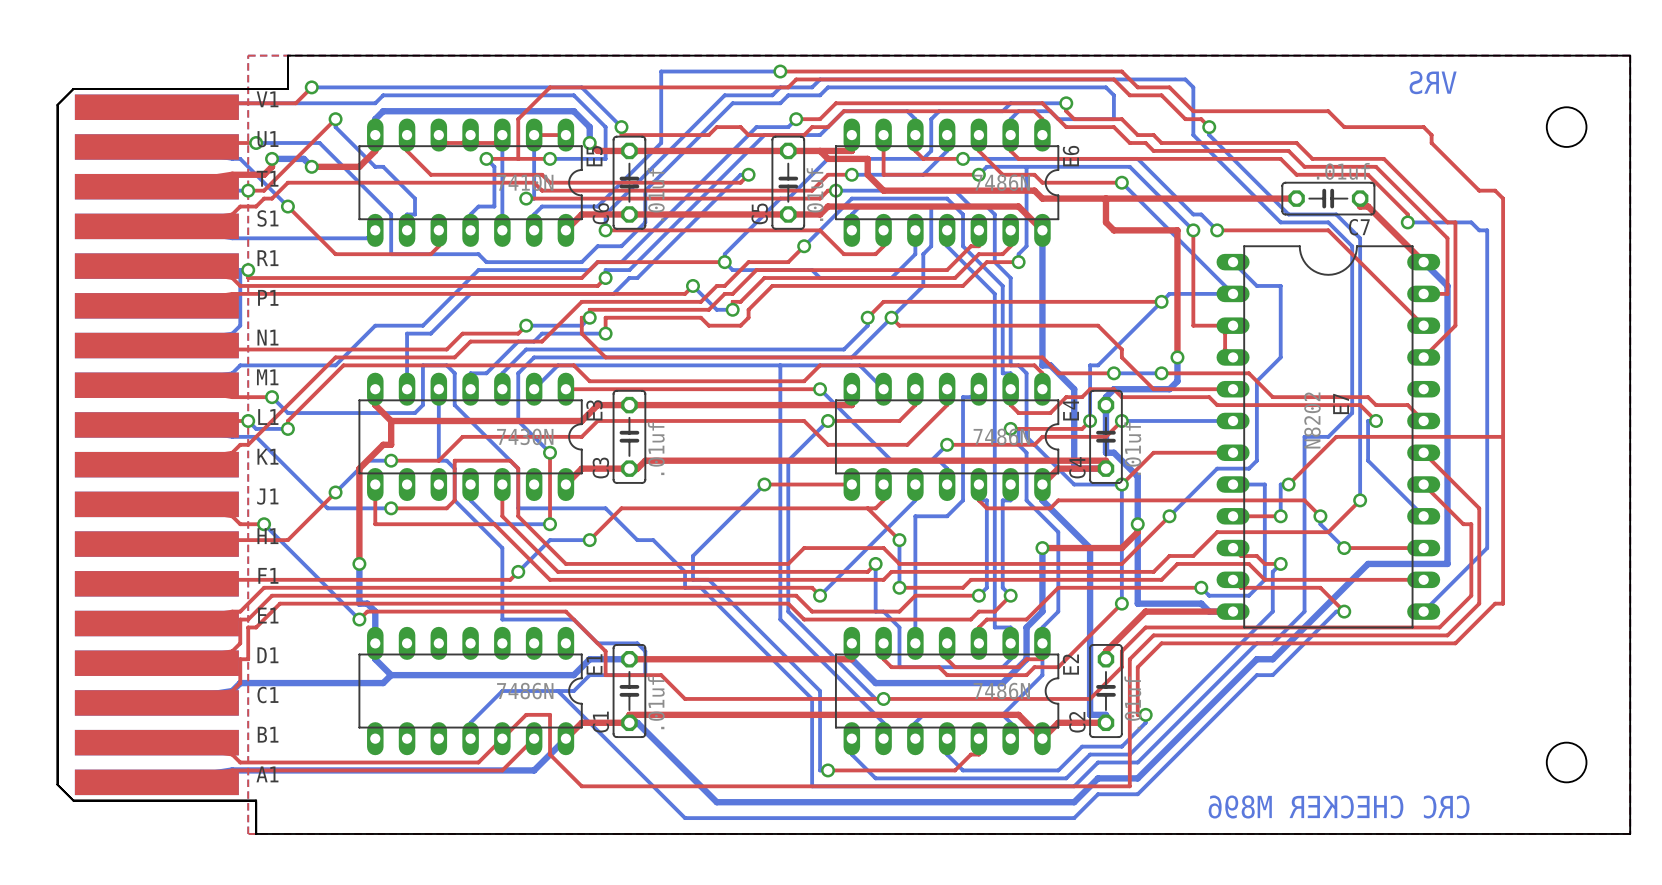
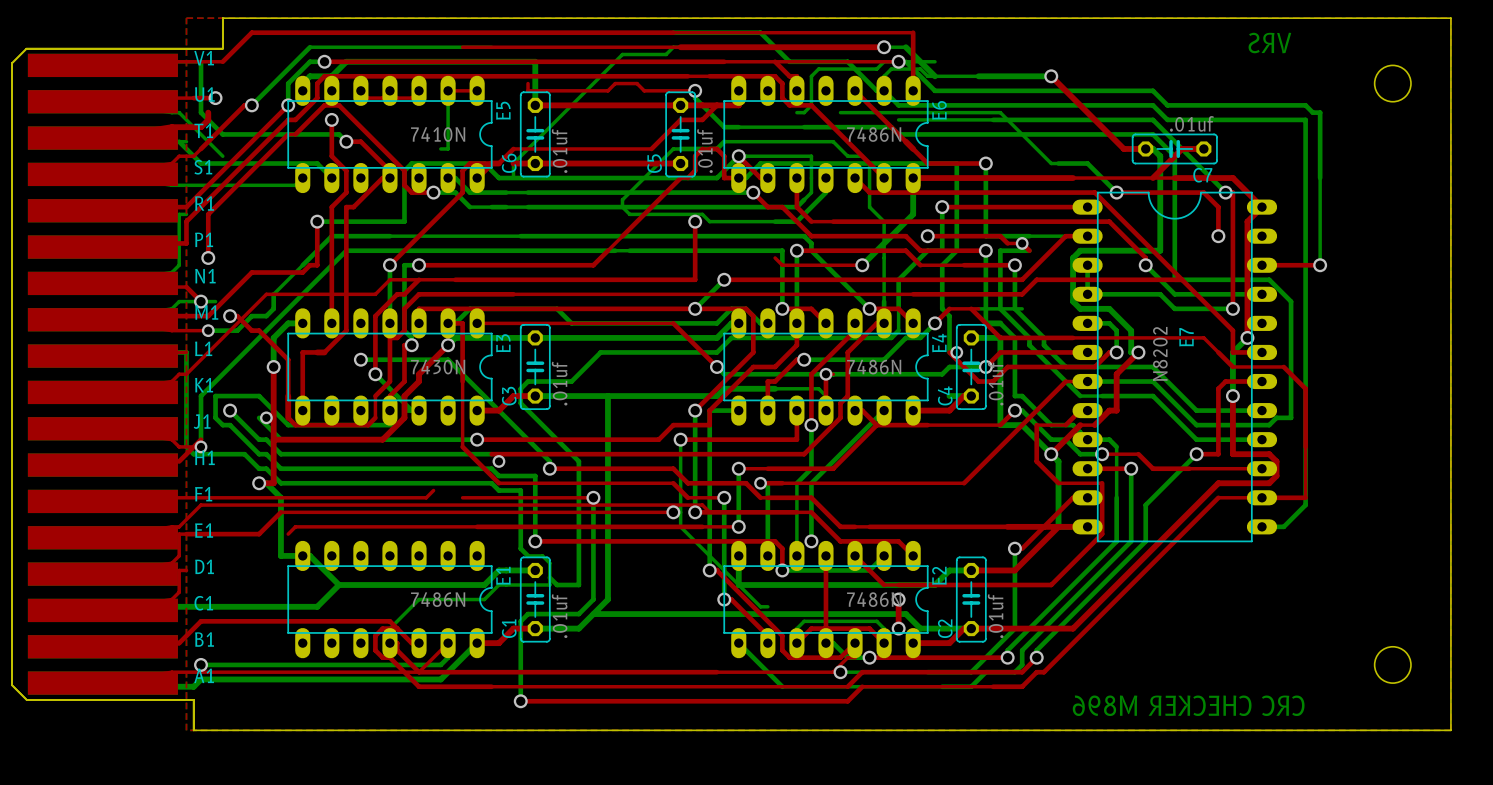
bottom track: (661, 71) (661, 143) (597, 206) (542, 206) (534, 214) (534, 230) -> (506, 192) (469, 192) (455, 178) (448, 178)
via: (780, 71) -> none
top track: (1042, 71) (1121, 71) (1137, 87) (1169, 87) (1193, 111) (1328, 111) (1344, 127) (1423, 127) (1431, 135) (1431, 143) (1479, 190) (1495, 190) (1503, 198) (1503, 603) (1495, 603) (1455, 643) (1161, 643) (1137, 667) (1137, 714) (1145, 714) -> none
top track: (311, 87) (295, 103) (287, 103) -> (673, 32) (251, 32) (222, 61)
bottom track: (311, 87) (383, 87) -> (251, 105) (310, 47)
via: (311, 87) -> none
top track: (550, 87) (518, 119) (518, 158) -> none
bottom track: (581, 87) (621, 127) -> none
top track: (788, 87) (796, 79) (1113, 79) (1129, 95) (1161, 95) (1185, 119) (1201, 119) (1209, 127) -> (680, 47) (884, 47)
bottom track: (812, 87) (820, 79) (1185, 79) (1193, 87) (1193, 135) (1280, 222) (1328, 222) (1352, 246) (1352, 413) (1328, 436) (1304, 436) (1304, 611) (1272, 643) (1256, 643) (1137, 762) (1098, 762) (1074, 786) -> (1131, 468) (1131, 541) (1022, 650) (1022, 664) (1014, 672) (985, 672) (971, 686) (942, 686)
bottom track: (828, 87) (820, 95) (788, 95) (780, 103) (732, 103) (645, 190) (645, 222) (621, 246) -> (753, 192) (528, 192)
via: none -> (884, 47)
bottom track: (1034, 87) (1105, 87) (1113, 95) (1113, 119) -> (905, 47) (934, 76)
bottom track: (264, 103) (375, 103) (383, 95) (573, 95) (605, 127) (605, 158) (550, 158) -> (201, 61) (201, 112) (222, 134) (339, 134) (346, 141)
bottom track: none -> (324, 61) (310, 61) (288, 83) (288, 105)
via: none -> (324, 61)
top track: (835, 103) (820, 119) -> (724, 61) (324, 61)
top track: (1026, 103) (1042, 103) (1066, 127) (1113, 127) (1129, 143) (1145, 143) (1153, 150) (1288, 150) (1304, 166) (1376, 166) (1447, 238) (1447, 293) (1423, 293) -> none
via: none -> (898, 61)
top track: (1066, 103) (1066, 111) (1074, 119) (1121, 119) (1137, 135) (1153, 135) (1161, 143) (1296, 143) (1312, 158) (1383, 158) (1447, 222) (1455, 222) (1455, 325) (1423, 357) -> none
via: (1066, 103) -> none
top track: (335, 119) (264, 190) (248, 190) -> none
bottom track: (335, 119) (335, 127) (375, 166) (383, 166) (415, 198) (415, 214) (407, 214) (407, 230) -> (179, 141) (201, 163) (317, 163) (331, 178)
via: (335, 119) -> none
bottom track: (796, 119) (788, 127) (756, 127) (621, 262) -> (804, 199) (796, 207) (528, 207)
via: (796, 119) -> none
top track: (1042, 119) (1034, 111) (843, 111) (828, 127) (812, 127) (804, 135) -> (913, 76) (913, 32)
bottom track: none -> (978, 76) (1051, 76)
top track: none -> (1051, 76) (1123, 148)
via: none -> (1051, 76)
bottom track: (375, 127) (375, 119) (383, 111) (573, 111) (589, 127) (589, 143) -> (302, 83) (310, 76) (331, 76) (346, 61) (535, 61) (535, 105)
via: (621, 127) -> none
bottom track: (1209, 127) (1209, 135) (1288, 214) (1336, 214) (1360, 238) (1360, 500) -> none
via: (1209, 127) -> none
top track: (375, 135) (375, 150) (359, 166) (311, 166) -> none
top track: (407, 135) (407, 150) (430, 174) (542, 174) (550, 182) (740, 182) (748, 174) -> none
bottom track: (502, 135) (502, 230) -> none
bottom track: none -> (695, 90) (695, 98) (724, 127) (738, 127)
via: none -> (695, 90)
top track: (883, 135) (883, 174) (978, 174) -> none
top track: (915, 135) (915, 150) (923, 158) (963, 158) -> (796, 90) (796, 76) (789, 76) (775, 61)
bottom track: (915, 135) (915, 119) (907, 111) (843, 111) (820, 135) (764, 135) (629, 270) (605, 270) (605, 278) -> none
bottom track: (947, 135) (947, 150) (923, 174) -> (1087, 381) (1153, 381) (1196, 425) (1269, 425) (1276, 417) (1291, 417) (1291, 301) (1269, 279) (1174, 279) (1174, 156) (1153, 134) (898, 134) (891, 127) (804, 127)
top track: (978, 135) (978, 150) (1002, 174) (1034, 174) (1042, 182) (1121, 182) -> (855, 90) (905, 141)
top track: (1010, 135) (1010, 150) (1018, 158) (1280, 158) (1296, 174) (1368, 174) (1407, 214) (1407, 222) -> none
top track: none -> (193, 98) (215, 98)
bottom track: (256, 143) (319, 143) (391, 214) (391, 254) (478, 254) (486, 262) (557, 262) -> (433, 192) (455, 192) (469, 207)
via: (256, 143) -> none
via: none -> (215, 98)
top track: (589, 143) (597, 150) (629, 150) -> none
via: (589, 143) -> none
via: none -> (251, 105)
via: none -> (288, 105)
top track: (820, 150) (828, 158) (867, 158) (867, 174) (883, 190) (1034, 190) -> none
bottom track: (272, 158) (303, 158) (311, 166) -> none
via: (272, 158) -> none
top track: (486, 158) (550, 158) -> none
bottom track: (486, 158) (494, 166) (494, 206) (478, 206) (470, 214) (470, 230) -> none
via: (486, 158) -> none
via: (550, 158) -> none
bottom track: (915, 158) (828, 158) (788, 198) -> (724, 141) (716, 148) (680, 148)
via: (963, 158) -> none
via: (311, 166) -> none
top track: none -> (331, 119) (331, 156) (346, 170) (346, 192) (331, 207) (331, 323)
via: none -> (331, 119)
bottom track: (1129, 166) (1193, 230) -> (993, 119) (1153, 119) (1225, 192)
bottom track: (748, 174) (740, 174) (637, 278) (629, 278) (613, 293) -> (869, 308) (811, 250) (811, 243) (804, 236) (520, 236)
via: (748, 174) -> none
top track: (851, 174) (828, 174) (812, 190) (542, 190) (534, 182) (367, 182) -> (433, 192) (411, 192) (404, 185) (404, 170) (339, 105) (324, 105) (295, 134)
via: (851, 174) -> none
bottom track: (978, 174) (986, 166) (1026, 166) (1026, 246) (1018, 254) (1018, 262) -> none
via: (978, 174) -> none
top track: (359, 182) (287, 182) (272, 198) (264, 198) -> (251, 105) (244, 105) (201, 148)
top track: none -> (288, 134) (208, 214) (208, 257)
bottom track: (1121, 182) (1233, 293) -> none
via: (1121, 182) -> none
via: (248, 190) -> none
via: none -> (346, 141)
top track: (835, 190) (828, 190) (820, 198) -> (738, 178) (724, 178) (724, 156) (716, 148) (709, 148)
via: (835, 190) -> none
top track: (526, 198) (605, 198) -> none
via: (526, 198) -> none
top track: (756, 198) (812, 198) -> (651, 148) (680, 119) (702, 119) (716, 105)
top track: none -> (702, 148) (695, 156) (695, 170) (687, 178)
top track: (1042, 198) (1272, 198) -> (913, 148) (927, 163) (985, 163)
top track: (1105, 198) (1105, 222) (1113, 230) -> (913, 178) (978, 178)
bottom track: none -> (1145, 148) (1153, 148) (1160, 156) (1160, 250) (1080, 250) (1073, 257) (1073, 301) (1080, 308) (1109, 308) (1131, 330) (1131, 352) (1138, 352)
top track: (1360, 198) (1360, 206) (1368, 206) (1391, 230) -> (1174, 178) (1232, 178)
top track: none -> (1203, 148) (1182, 148) (1153, 178)
top track: (287, 206) (335, 254) (430, 254) (438, 246) (438, 230) -> none
via: (287, 206) -> none
bottom track: none -> (738, 156) (716, 178) (498, 178) (484, 163) (411, 163) (404, 170) (404, 221) (317, 221)
via: none -> (738, 156)
top track: none -> (491, 163) (469, 163) (462, 170) (462, 192) (389, 265)
top track: (589, 214) (605, 214) -> (498, 163) (513, 148)
top track: (788, 214) (820, 214) (828, 206) (1018, 206) (1042, 230) -> none
via: none -> (985, 163)
bottom track: (1201, 214) (1217, 230) -> (1058, 163) (1087, 163) (1116, 192)
bottom track: (1407, 222) (1471, 222) (1479, 230) (1487, 230) -> (905, 61) (934, 90) (1153, 90) (1167, 105) (1305, 105) (1312, 112) (1320, 112) (1320, 178)
via: (1407, 222) -> none
top track: (605, 230) (788, 230) -> (622, 236) (680, 178)
via: (605, 230) -> none
top track: (796, 230) (820, 230) (843, 254) (875, 254) (883, 246) (883, 230) -> (738, 156) (760, 178) (767, 178)
bottom track: none -> (738, 178) (746, 178) (760, 163) (956, 163) (956, 250) (942, 265) (942, 308) (949, 316) (949, 352)
bottom track: (915, 230) (915, 254) (891, 278) -> (825, 192) (796, 221) (775, 221)
top track: (978, 230) (978, 246) (970, 246) (947, 270) (756, 270) (732, 293) (724, 293) -> none
top track: (1010, 230) (1010, 246) (1002, 254) (978, 254) (955, 278) -> (884, 178) (811, 105) (789, 105) (782, 98) (782, 83) (775, 76) (709, 76)
top track: (1177, 230) (1177, 357) -> (1036, 178) (1073, 178)
top track: (1193, 230) (1193, 325) (1233, 325) (1225, 333) (1225, 349) (1233, 357) -> none
via: (1193, 230) -> none
via: (1217, 230) -> none
top track: (1328, 230) (1423, 325) -> (1320, 265) (1262, 265)
via: none -> (433, 192)
bottom track: (597, 246) (581, 262) -> (506, 207) (491, 207)
top track: (804, 246) (788, 262) (748, 262) (724, 285) (716, 285) (700, 301) (581, 301) (542, 341) -> (695, 221) (695, 279) (455, 279)
bottom track: (804, 246) (851, 198) (947, 198) (963, 214) (963, 246) (1002, 285) (1002, 373) (1010, 373) -> none
via: (804, 246) -> none
top track: none -> (753, 192) (767, 207) (782, 207) (811, 236) (905, 236) (920, 250) (985, 250)
via: none -> (753, 192)
bottom track: (947, 246) (994, 293) (994, 627) (1010, 627) (1010, 659) (1002, 667) (899, 667) (899, 627) (883, 611) (875, 611) (875, 563) -> none
top track: none -> (1116, 192) (1203, 192) (1218, 207) (1218, 236)
via: none -> (1116, 192)
top track: none -> (1225, 192) (1232, 192) (1232, 308)
via: none -> (1225, 192)
bottom track: (923, 254) (923, 285) (851, 357) (534, 357) (518, 373) (518, 420) (550, 452) -> none
bottom track: (597, 262) (589, 270) (478, 270) (422, 325) (375, 325) -> none
top track: (724, 262) (597, 262) (581, 278) (248, 278) (248, 270) -> none
via: (724, 262) -> none
top track: (1018, 262) (986, 262) (963, 285) (772, 285) (748, 309) (748, 317) (740, 325) (708, 325) (700, 317) (605, 317) (605, 333) -> none
via: (1018, 262) -> none
top track: none -> (942, 207) (1087, 207)
bottom track: none -> (942, 207) (942, 250) (927, 250) (898, 279) (898, 308)
via: none -> (942, 207)
bottom track: (1233, 262) (1256, 285) (1280, 285) (1280, 357) (1256, 381) (1256, 460) (1248, 468) -> none
top track: none -> (1262, 207) (1247, 221) (1247, 337)
bottom track: (1423, 262) (1447, 285) (1447, 563) (1368, 563) (1272, 659) (1256, 659) (1137, 778) (1098, 778) (1074, 802) (716, 802) (637, 722) -> (607, 396) (607, 599) (578, 628) (542, 628)
top track: (156, 266) (232, 278) (240, 285) (597, 285) (605, 278) -> (102, 210) (106, 207) (186, 207) (288, 105)
via: (248, 270) -> none
bottom track: (1042, 270) (1042, 365) (1050, 365) (1074, 389) (1074, 468) (1082, 468) -> (913, 214) (862, 265)
top track: none -> (317, 221) (317, 265) (310, 265) (302, 272) (251, 272) (208, 316) (106, 316) (102, 319)
via: none -> (317, 221)
via: (605, 278) -> none
via: none -> (695, 221)
top track: (931, 278) (764, 278) (740, 301) (732, 301) (732, 309) -> (811, 221) (796, 207) (796, 178)
top track: none -> (833, 221) (1109, 221) (1145, 257) (1145, 265)
top track: (692, 285) (685, 293) (232, 293) (156, 305) -> (687, 76) (324, 76) (317, 83) (317, 98) (295, 119) (288, 119) (186, 221) (186, 243) (106, 243) (102, 247)
bottom track: (692, 285) (716, 309) -> (201, 439) (201, 396) (346, 250) (615, 250)
via: (692, 285) -> none
bottom track: (470, 293) (430, 333) (407, 333) (407, 389) -> (389, 236) (331, 236) (302, 265)
via: none -> (927, 236)
bottom track: (1169, 293) (1098, 365) (1090, 365) (1090, 420) -> (1029, 236) (985, 236) (985, 163)
top track: none -> (1087, 236) (1065, 236) (1022, 279) (724, 279)
via: none -> (1218, 236)
top track: (1145, 301) (883, 301) (867, 317) -> (1007, 243) (1000, 236) (927, 236)
top track: none -> (1022, 243) (1029, 250)
top track: (708, 309) (589, 309) (589, 317) (581, 317) (581, 333) (605, 357) -> (607, 250) (593, 265) (419, 265)
bottom track: none -> (629, 250) (782, 250) (782, 308)
via: (732, 309) -> none
bottom track: none -> (796, 250) (796, 323)
via: none -> (796, 250)
bottom track: none -> (985, 250) (985, 323)
via: none -> (985, 250)
via: none -> (208, 257)
bottom track: (589, 317) (581, 325) (526, 325) -> none
via: (589, 317) -> none
bottom track: (867, 317) (867, 325) (843, 349) (526, 349) (502, 373) (502, 389) -> none
via: (867, 317) -> none
via: (891, 317) -> none
via: none -> (389, 265)
bottom track: none -> (419, 265) (404, 265) (404, 330) (411, 337) (411, 345)
via: none -> (419, 265)
top track: (526, 325) (518, 333) (462, 333) (446, 349) (248, 349) -> (201, 301) (186, 287)
via: (526, 325) -> none
top track: (986, 325) (1050, 325) -> (796, 250) (905, 250) (920, 265)
via: none -> (862, 265)
top track: (1098, 325) (1121, 349) (1121, 357) (1153, 389) (1233, 389) -> (964, 265) (1014, 265)
bottom track: none -> (1014, 265) (1014, 308) (1043, 337) (1043, 345) (1065, 366) (1153, 366) (1196, 410) (1262, 410)
via: none -> (1014, 265)
bottom track: none -> (1087, 265) (1087, 294) (1160, 294) (1174, 308) (1232, 308)
bottom track: none -> (1145, 265) (1174, 294) (1262, 294)
via: none -> (1145, 265)
bottom track: (1487, 325) (1487, 548) (1423, 611) -> (673, 32) (760, 32) (789, 61) (847, 61) (876, 90) (884, 90) (898, 105) (1153, 105) (1167, 119) (1305, 119) (1305, 505) (1283, 526) (1262, 526)
via: none -> (1320, 265)
bottom track: (605, 333) (542, 333) (534, 341) (518, 341) (486, 373) (470, 373) -> (389, 265) (389, 308)
via: (605, 333) -> none
top track: none -> (419, 279) (404, 294) (397, 294) (375, 316) (375, 374)
bottom track: none -> (724, 279) (695, 308)
via: none -> (724, 279)
top track: none -> (1182, 279) (1036, 279) (1022, 294) (913, 294)
bottom track: (343, 357) (335, 365) (279, 365) -> (273, 294) (273, 308) (266, 316) (251, 316) (237, 330) (208, 330)
top track: none -> (513, 294) (419, 294) (404, 308) (404, 330) (397, 337) (389, 337) (389, 381) (375, 396)
top track: (1042, 357) (1058, 373) (1082, 373) -> (934, 323) (949, 308)
bottom track: (1177, 357) (1177, 381) (1169, 389) (1137, 389) -> none
via: (1177, 357) -> none
via: none -> (201, 301)
bottom track: (780, 365) (780, 619) (883, 722) (883, 738) -> none
bottom track: (1010, 365) (1018, 365) (1026, 373) -> (884, 301) (884, 308)
via: none -> (695, 308)
via: none -> (782, 308)
via: none -> (869, 308)
via: (1113, 373) -> none
top track: (1161, 373) (1248, 373) (1272, 397) (1368, 397) (1376, 405) (1407, 405) (1423, 420) -> (855, 178) (869, 192) (1094, 192) (1232, 330) (1232, 352) (1262, 352)
via: (1161, 373) -> none
via: none -> (1232, 308)
via: none -> (230, 316)
top track: (375, 389) (375, 405) (391, 420) (391, 444) (383, 444) (359, 468) -> (230, 316) (237, 316) (251, 330) (259, 330) (288, 359) (288, 396)
bottom track: none -> (302, 323) (288, 323) (273, 337) (273, 366)
bottom track: (438, 389) (438, 460) (446, 460) (454, 468) (454, 500) (502, 548) (502, 619) (573, 619) (597, 643) (621, 643) -> none
top track: none -> (419, 323) (419, 308) (746, 308) (753, 316) (753, 352) (695, 410)
top track: none -> (448, 323) (462, 323) (462, 381)
bottom track: (534, 389) (557, 365) (859, 365) (883, 389) -> (448, 323) (455, 323) (469, 308) (557, 308) (571, 323) (716, 323) (731, 308) (746, 308) (760, 323) (767, 323)
top track: (780, 389) (820, 389) -> (673, 323) (716, 366)
bottom track: (820, 389) (891, 460) -> (535, 396) (716, 396) (724, 388) (775, 388)
via: (820, 389) -> none
top track: (851, 389) (851, 405) (597, 405) (581, 420) (399, 420) -> (346, 141) (360, 141) (389, 170) (389, 178) (382, 178) (353, 207) (346, 207) (346, 330) (324, 352)
bottom track: none -> (738, 323) (731, 323) (716, 337) (455, 337) (448, 345)
top track: (947, 389) (947, 405) (907, 444) (828, 444) (804, 420) (597, 420) (581, 436) (462, 436) (438, 460) (391, 460) -> (825, 323) (811, 308) (782, 308)
top track: none -> (855, 323) (855, 330) (811, 374) (811, 425)
bottom track: (978, 389) (970, 397) (963, 397) (963, 500) (947, 516) (915, 516) (915, 563) -> (811, 425) (811, 468) (796, 483)
top track: (1010, 389) (1010, 405) (1018, 413) (1050, 413) (1066, 397) (1082, 397) (1090, 389) (1113, 389) (1121, 397) (1209, 397) (1217, 405) -> (971, 308) (1000, 337) (1073, 337)
top track: none -> (884, 323) (876, 323) (847, 352) (847, 396) (840, 403) (840, 417) (804, 454) (491, 454)
top track: (1042, 389) (1042, 373) (1034, 365) (820, 365) (804, 381) (589, 381) (573, 365) (343, 365) (287, 420) (287, 428) -> (913, 323) (898, 308) (869, 308)
bottom track: none -> (934, 323) (920, 337) (905, 337) (884, 359) (804, 359)
via: none -> (934, 323)
bottom track: (1121, 389) (1113, 389) (1105, 397) (1105, 452) (1113, 452) (1137, 476) -> (971, 337) (1000, 337) (1000, 403)
bottom track: none -> (1087, 323) (1109, 323) (1116, 330) (1116, 352)
bottom track: (272, 397) (287, 413) (415, 413) (422, 405) (422, 365) (446, 365) (454, 373) (454, 405) (518, 468) (518, 508) (605, 508) (637, 540) (653, 540) (685, 571) (685, 587) (700, 587) (812, 698) (812, 786) (899, 786) -> none
bottom track: (1026, 397) (1026, 436) (1074, 484) (1121, 484) (1121, 603) -> (898, 330) (891, 337) (731, 337) (716, 352) (600, 352) (571, 381) (528, 381) (520, 388) (520, 403) (578, 461) (578, 585) (557, 585) (549, 577)
top track: (915, 405) (899, 420) (828, 420) -> (796, 337) (796, 345) (775, 366) (753, 366) (709, 410) (709, 425) (673, 425) (658, 439) (477, 439)
bottom track: none -> (1247, 337) (1232, 352) (1232, 396)
via: none -> (1247, 337)
top track: none -> (411, 345) (404, 345) (404, 381) (389, 396) (389, 410)
via: none -> (411, 345)
top track: none -> (448, 345) (419, 374) (419, 381) (404, 396) (404, 417) (382, 439) (273, 439)
via: none -> (448, 345)
bottom track: (248, 420) (256, 428) (287, 428) -> none
via: (248, 420) -> none
bottom track: (828, 420) (788, 460) (788, 516) -> none
via: (828, 420) -> none
top track: none -> (949, 352) (978, 381) (993, 381) (1007, 366) (1094, 366) (1109, 352) (1116, 352)
top track: (1090, 420) (1082, 428) (1010, 428) -> none
top track: (1121, 420) (1105, 436) (1042, 436) (1034, 444) (955, 444) -> none
bottom track: (1121, 420) (1233, 420) -> none
via: (1121, 420) -> none
top track: none -> (1087, 352) (1000, 352) (985, 366)
via: none -> (1116, 352)
via: none -> (1138, 352)
bottom track: (1376, 420) (1368, 420) (1368, 460) (1423, 516) -> (1102, 396) (1153, 396) (1196, 439) (1262, 439)
via: (1376, 420) -> none
bottom track: (156, 424) (232, 436) (256, 436) (327, 508) (391, 508) -> (102, 356) (106, 352) (186, 352) (186, 446) (193, 454) (244, 454) (259, 468) (266, 468) (280, 483) (491, 483) (498, 490) (520, 490) (520, 548) (528, 555)
via: (287, 428) -> none
bottom track: none -> (360, 359) (448, 359) (549, 461) (549, 468)
via: none -> (360, 359)
via: none -> (804, 359)
bottom track: (1010, 428) (1018, 428) (1018, 444) (1026, 452) (1026, 500) (1058, 532) (1058, 611) (1042, 627) (1042, 675) (1002, 714) -> none
via: (1010, 428) -> none
top track: none -> (273, 366) (273, 483) (259, 483)
via: none -> (273, 366)
bottom track: none -> (716, 366) (724, 374) (942, 374) (949, 366) (985, 366)
via: none -> (716, 366)
via: none -> (985, 366)
top track: (1391, 436) (1336, 436) (1288, 484) -> (1232, 366) (1218, 352)
top track: (1447, 436) (1503, 436) -> none
bottom track: none -> (375, 374) (411, 410)
via: none -> (375, 374)
top track: none -> (825, 374) (825, 410)
bottom track: (947, 444) (931, 460) -> none
via: (550, 452) -> none
top track: (1209, 452) (1153, 452) (1121, 484) -> none
top track: (1423, 452) (1479, 508) (1479, 603) (1447, 635) (1161, 635) -> (1262, 381) (1225, 381) (1218, 388) (1218, 454) (1196, 454)
bottom track: (391, 460) (367, 460) (335, 492) -> none
via: (391, 460) -> none
top track: (454, 468) (454, 460) (510, 460) (518, 468) (518, 516) (565, 563) (589, 563) -> (462, 446) (498, 483)
top track: (605, 468) (581, 468) (565, 484) -> (513, 396) (498, 410) (477, 410)
top track: (629, 468) (637, 468) (645, 460) (1105, 460) (1105, 468) -> none
top track: (1098, 468) (1058, 468) (1042, 484) -> (964, 396) (949, 410) (913, 410)
bottom track: (1225, 468) (1217, 468) (1169, 516) -> (1080, 396) (1029, 345) (1029, 337) (1000, 308) (1000, 250) (1029, 250)
top track: none -> (1232, 396) (1232, 454) (1269, 454) (1276, 461) (1276, 475) (1269, 483) (1218, 483) (1073, 628) (971, 628)
via: none -> (1232, 396)
bottom track: none -> (230, 410) (259, 439) (266, 439) (280, 454) (491, 454)
via: none -> (230, 410)
top track: (375, 484) (375, 524) (494, 524) (550, 579) -> (302, 410) (302, 352) (317, 352)
bottom track: (470, 484) (470, 500) (494, 524) (550, 524) -> none
top track: (502, 484) (502, 516) (557, 571) (867, 571) (875, 563) -> none
bottom track: none -> (419, 410) (404, 410) (404, 417) (397, 425) (288, 425) (259, 396) (215, 396) (215, 417) (222, 425) (230, 425) (259, 454) (266, 454) (280, 468) (491, 468) (498, 475) (535, 475) (535, 541)
top track: (764, 484) (851, 484) -> none
bottom track: (764, 484) (692, 556) (692, 579) (708, 579) (820, 691) (820, 770) (828, 770) -> none
via: (764, 484) -> none
bottom track: none -> (695, 410) (695, 512)
via: none -> (695, 410)
bottom track: none -> (738, 410) (709, 410) (709, 570)
top track: (883, 484) (883, 500) (875, 508) (621, 508) (589, 540) -> (767, 410) (767, 381) (775, 381) (796, 359) (804, 359)
top track: none -> (796, 410) (796, 439) (680, 439)
bottom track: (915, 484) (915, 500) (820, 595) -> none
top track: (978, 484) (978, 500) (986, 508) (1050, 508) (1058, 500) -> (876, 425) (927, 425)
top track: none -> (855, 410) (862, 410) (876, 425)
bottom track: (978, 484) (978, 500) (986, 500) (986, 587) (978, 595) -> none
bottom track: (1010, 484) (1010, 500) (1002, 500) (1002, 587) (1010, 595) -> (884, 410) (811, 483) (811, 541)
bottom track: (1042, 484) (1042, 500) (1090, 548) (1090, 714) (1105, 714) (1105, 722) -> (593, 614) (905, 614) (920, 628) (971, 628)
via: (1121, 484) -> none
bottom track: none -> (1014, 410) (1022, 410) (1051, 439) (1065, 439) (1080, 454) (1102, 454)
via: none -> (1014, 410)
bottom track: (1233, 484) (1264, 484) (1264, 524) -> (1000, 323) (1014, 337) (1014, 396) (1022, 396) (1051, 425) (1073, 425) (1080, 432) (1080, 439) (1109, 439) (1116, 446)
bottom track: (1288, 484) (1280, 484) (1280, 516) -> none
via: (1288, 484) -> none
top track: (1423, 484) (1463, 524) (1471, 524) -> (1283, 366) (1305, 388) (1305, 446)
bottom track: none -> (259, 417) (280, 439) (477, 439)
top track: (335, 492) (287, 540) (240, 540) -> (201, 439) (179, 461)
top track: (359, 492) (359, 563) -> none
top track: (454, 492) (454, 500) (446, 508) (391, 508) -> (375, 417) (368, 425) (295, 425) (288, 417)
via: none -> (811, 425)
top track: none -> (876, 425) (833, 468) (767, 468)
top track: (1137, 500) (1177, 500) -> (1000, 425) (1014, 410)
bottom track: (1137, 500) (1137, 603) (1201, 603) (1209, 611) -> (1000, 425) (1022, 425) (1058, 461) (1058, 526) (1065, 526)
top track: (1209, 500) (1225, 500) -> (1065, 425) (1080, 410) (1087, 410)
top track: none -> (1080, 425) (1051, 454)
top track: (1241, 500) (1304, 500) (1320, 516) -> (1094, 425) (1109, 410) (1116, 410) (1116, 374) (1138, 352)
top track: (1360, 500) (1328, 532) (1288, 532) -> (1189, 468) (1153, 468) (1138, 454)
via: (1360, 500) -> none
via: (391, 508) -> none
top track: (867, 508) (899, 540) -> none
via: none -> (477, 439)
via: none -> (680, 439)
top track: (1169, 516) (1121, 563) (1098, 563) -> (1065, 381) (964, 483)
via: (1169, 516) -> none
top track: (1233, 516) (1280, 516) -> none
via: (1280, 516) -> none
bottom track: (1320, 516) (1320, 524) (1344, 548) -> none
via: (1320, 516) -> none
bottom track: (264, 524) (359, 619) -> none
via: (550, 524) -> none
top track: (1137, 524) (1137, 532) (1121, 548) (1042, 548) -> none
via: (1137, 524) -> none
via: none -> (1051, 454)
top track: (1248, 532) (1217, 532) (1193, 556) (1169, 556) (1153, 571) (891, 571) (883, 579) -> (855, 526) (840, 526) (811, 497) (767, 497)
via: none -> (1102, 454)
bottom track: none -> (1196, 454) (1145, 505) (1145, 541) (1036, 650) (1036, 657)
via: none -> (1196, 454)
bottom track: (589, 540) (550, 540) (518, 571) -> none
bottom track: (899, 540) (899, 587) -> none
via: (899, 540) -> none
via: none -> (549, 468)
top track: (851, 548) (804, 548) (788, 563) (780, 563) -> (687, 497) (673, 483)
bottom track: none -> (738, 468) (738, 526)
via: none -> (738, 468)
top track: (883, 548) (899, 563) -> (767, 483) (782, 483)
bottom track: (1042, 548) (1042, 611) (1026, 627) (1026, 659) (1002, 683) (875, 683) (851, 659) -> (971, 570) (949, 570) (934, 585) (738, 585) (738, 570)
via: (1042, 548) -> none
top track: (1233, 548) (1241, 556) (1256, 556) (1264, 563) (1280, 563) -> (1087, 468) (1131, 468)
via: none -> (1131, 468)
via: (1344, 548) -> none
via: none -> (259, 483)
bottom track: (359, 563) (359, 603) (367, 603) (375, 611) (375, 659) (391, 675) -> none
via: (359, 563) -> none
bottom track: none -> (767, 483) (767, 555)
top track: (1201, 563) (1177, 563) (1161, 579) (970, 579) (963, 587) (899, 587) -> (1058, 483) (1036, 461) (1036, 425)
top track: (1248, 563) (1264, 579) (1376, 579) -> none
bottom track: (1280, 563) (1272, 571) (1272, 611) (1129, 754) (1090, 754) (1066, 778) (875, 778) (851, 754) (851, 738) -> (782, 686) (738, 643)
via: (1280, 563) -> none
via: (518, 571) -> none
top track: (692, 579) (796, 579) -> none
bottom track: none -> (593, 497) (593, 599) (578, 614) (528, 614) (520, 621) (520, 701)
via: none -> (593, 497)
top track: (835, 579) (875, 579) -> (549, 468) (673, 468) (687, 483) (746, 483) (760, 497)
bottom track: none -> (724, 497) (724, 599)
via: none -> (724, 497)
top track: (1233, 579) (1241, 587) (1320, 587) (1344, 611) -> (1087, 497) (1073, 497) (1022, 548)
bottom track: (1264, 579) (1248, 595) (1209, 595) (1201, 587) -> (1116, 497) (1116, 541) (1007, 650) (1007, 657)
top track: (1471, 579) (1471, 595) (1439, 627) (1145, 627) (1121, 651) (1121, 667) (1090, 698) (685, 698) (661, 675) (605, 675) (605, 651) (565, 611) -> (1305, 497) (1262, 497)
via: (899, 587) -> none
top track: (1201, 587) (1058, 587) (1026, 619) (986, 619) (978, 627) (978, 643) -> none
via: (1201, 587) -> none
top track: (351, 595) (272, 595) (248, 619) -> (280, 512) (259, 534) (186, 534)
top track: (780, 595) (796, 595) (812, 611) -> (477, 526) (702, 526)
via: none -> (673, 512)
via: none -> (695, 512)
via: (820, 595) -> none
top track: (915, 595) (899, 611) (851, 611) -> (796, 512) (695, 512)
top track: (931, 595) (978, 595) -> none
via: (978, 595) -> none
top track: (1010, 595) (994, 611) -> (1007, 526) (869, 526)
via: (1010, 595) -> none
top track: (1121, 603) (1058, 667) (1034, 667) (1026, 675) -> (1102, 483) (1102, 534) (1051, 585) (898, 585)
via: (1121, 603) -> none
via: none -> (738, 526)
top track: (978, 611) (970, 619) (804, 619) (788, 603) (279, 603) (256, 627) (248, 627) (248, 659) -> none
top track: (1145, 611) (1105, 651) (1105, 659) -> (1058, 526) (1014, 570) (971, 570)
bottom track: (1344, 611) (1336, 611) (1272, 675) (1256, 675) (1137, 794) (1098, 794) (1074, 818) (685, 818) (557, 691) -> none
via: (1344, 611) -> none
via: (359, 619) -> none
top track: none -> (535, 541) (775, 541) (782, 548) (782, 570)
via: none -> (535, 541)
via: none -> (811, 541)
top track: (1153, 635) (1129, 659) (1129, 786) -> (1218, 497) (1043, 672) (1036, 672) (1022, 686) (993, 686)
via: none -> (1014, 548)
top track: (851, 643) (851, 659) (828, 659) -> (855, 643) (840, 657) (789, 657) (782, 650) (782, 635) (716, 570)
top track: (883, 643) (883, 659) (891, 667) (939, 667) (947, 675) (1010, 675) -> (855, 555) (884, 585)
bottom track: none -> (884, 555) (869, 570) (782, 570)
top track: (1042, 643) (1042, 659) (1026, 659) (1018, 667) (955, 667) (947, 659) -> (913, 555) (898, 541) (840, 541) (811, 512)
top track: (629, 659) (820, 659) -> none
via: none -> (709, 570)
via: none -> (782, 570)
top track: none -> (825, 570) (825, 628)
bottom track: (391, 675) (383, 683) (240, 683) (232, 691) (156, 702) -> (259, 483) (266, 483) (280, 497) (280, 555) (310, 555) (339, 585) (317, 606) (106, 606) (102, 610)
bottom track: (391, 675) (415, 675) -> none
top track: none -> (724, 599) (731, 599) (767, 635) (767, 643)
via: none -> (724, 599)
top track: none -> (898, 599) (898, 628)
via: none -> (898, 599)
via: (883, 698) -> none
bottom track: (1145, 714) (1145, 722) (1121, 746) (1082, 746) (1058, 770) -> (1014, 548) (1014, 628) (971, 672) (927, 672)
via: (1145, 714) -> none
top track: none -> (397, 628) (382, 628) (375, 635) (375, 650) (382, 657) (389, 657) (419, 686) (491, 686)
top track: (605, 722) (581, 722) (565, 738) -> (513, 628) (498, 643) (477, 643)
top track: (629, 722) (629, 714) (1018, 714) (1042, 738) (1058, 722) (1098, 722) -> (913, 643) (949, 643) (964, 628)
via: none -> (898, 628)
top track: none -> (389, 643) (397, 643) (397, 650) (419, 672) (716, 672)
bottom track: none -> (448, 643) (448, 657) (440, 664) (201, 664)
top track: none -> (796, 643) (811, 628) (869, 628) (884, 643)
bottom track: (947, 738) (947, 754) (963, 770) -> (825, 643) (833, 643) (847, 657) (869, 657)
top track: (156, 742) (232, 754) (240, 762) (478, 762) (526, 714) (550, 714) (550, 754) (581, 786) -> (102, 646) (106, 643) (179, 643) (201, 621) (389, 621) (411, 643) (419, 643)
top track: none -> (869, 657) (1007, 657)
via: none -> (869, 657)
via: none -> (1007, 657)
via: none -> (1036, 657)
via: none -> (201, 664)
bottom track: (534, 770) (232, 770) (156, 782) -> (448, 672) (440, 679) (201, 679) (193, 686) (106, 686) (102, 683)
via: (828, 770) -> none
via: none -> (840, 672)
top track: (970, 786) (986, 786) -> (847, 686) (862, 672) (1022, 672) (1036, 657)
top track: none -> (862, 686) (847, 701) (520, 701)
via: none -> (520, 701)

